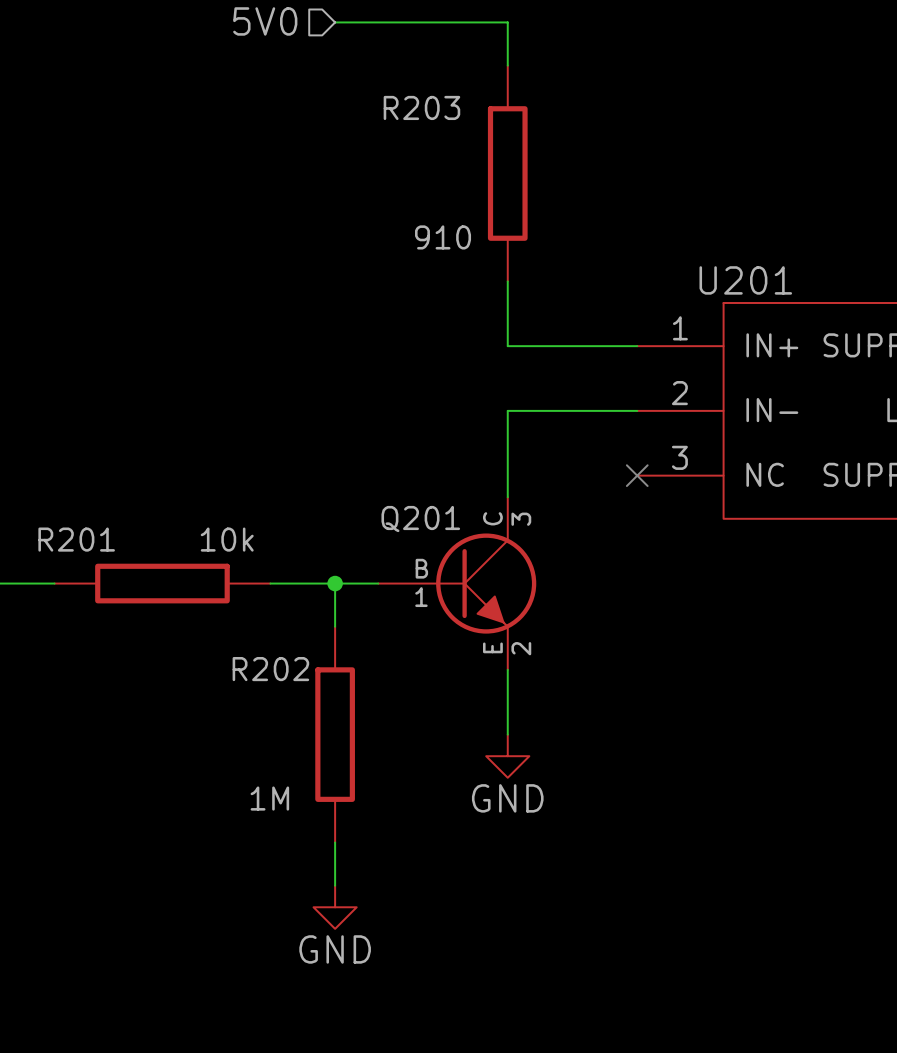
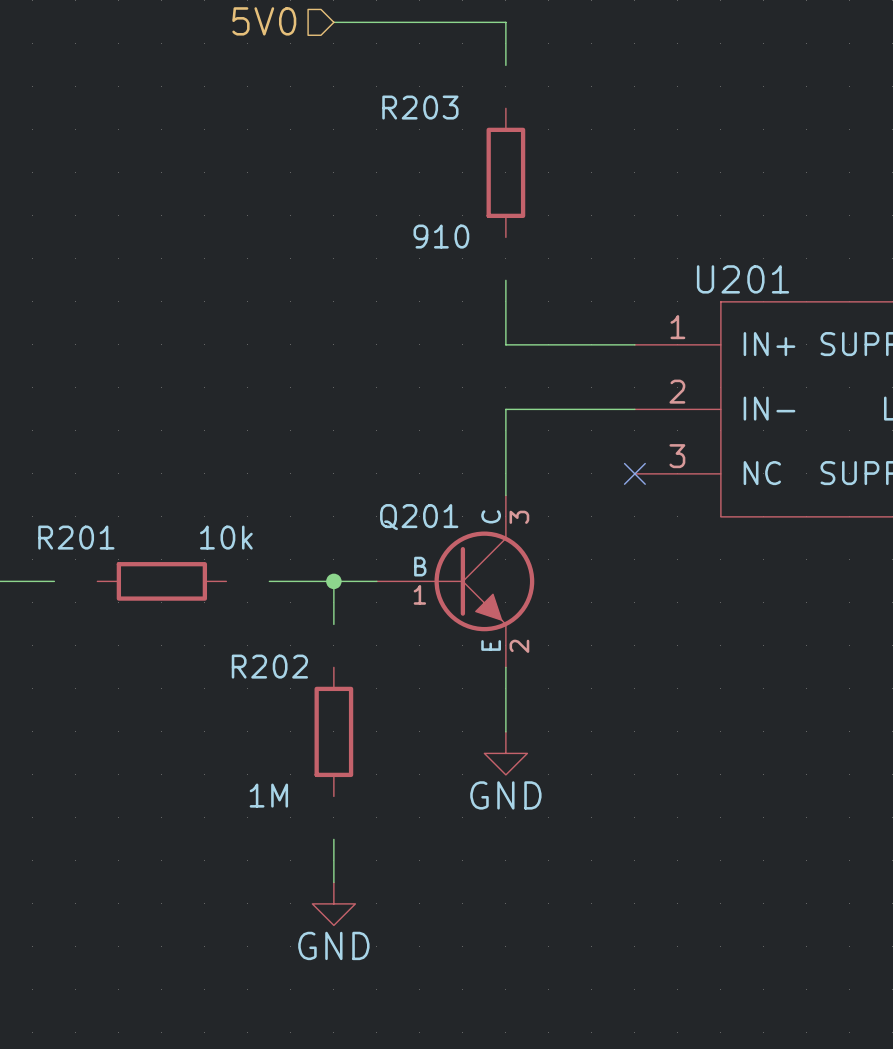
R203 symbol: [487, 65, 528, 282] -> [486, 108, 526, 238]
R201 symbol: [54, 563, 271, 604] -> [97, 562, 227, 601]
R202 symbol: [315, 626, 355, 843] -> [314, 667, 354, 797]

